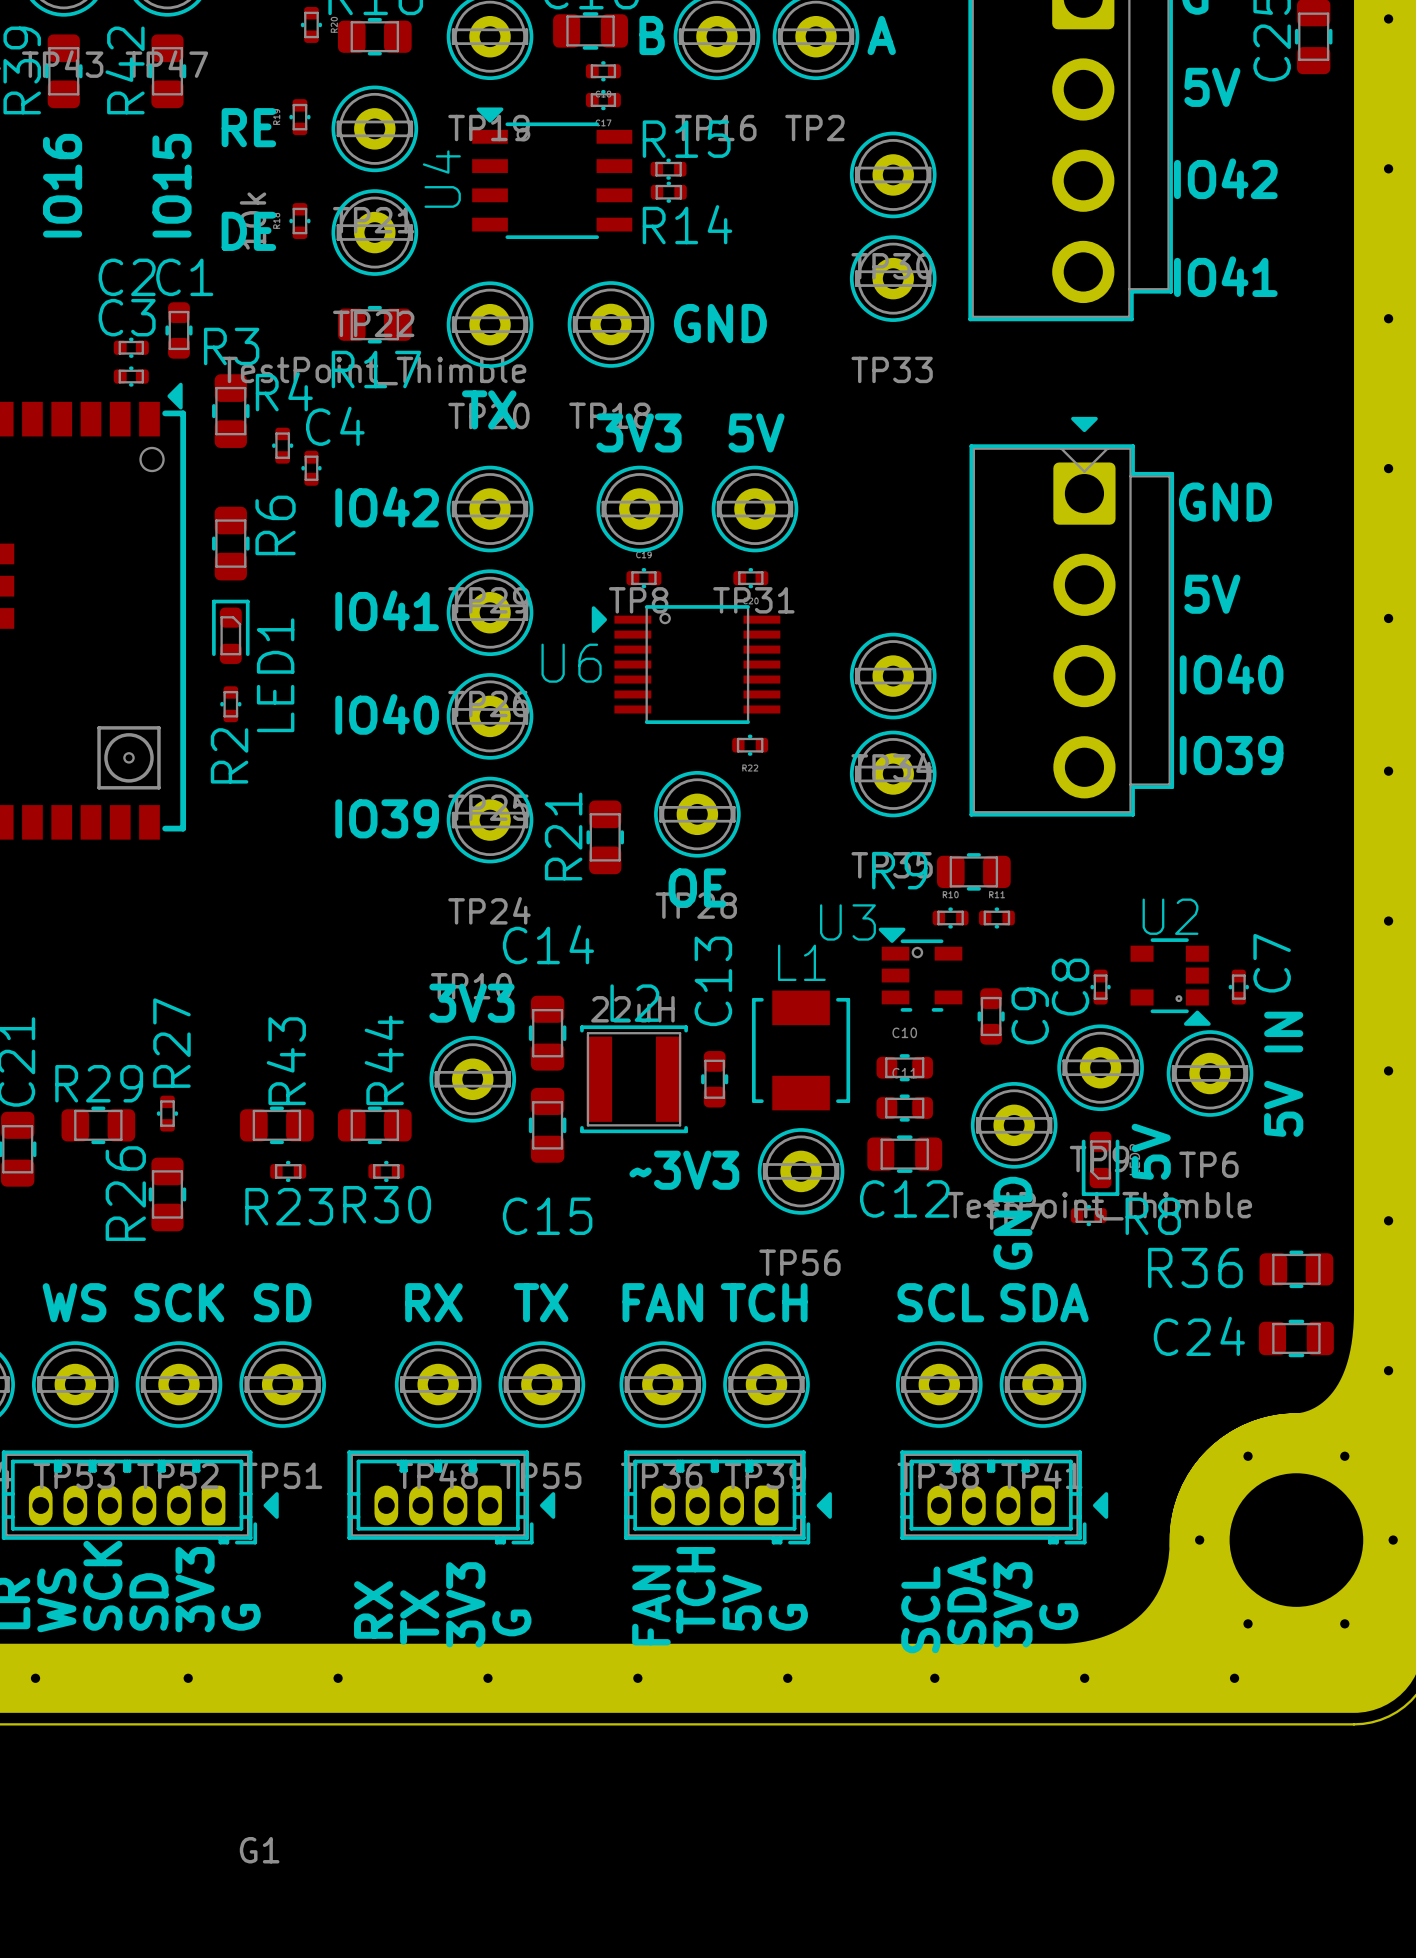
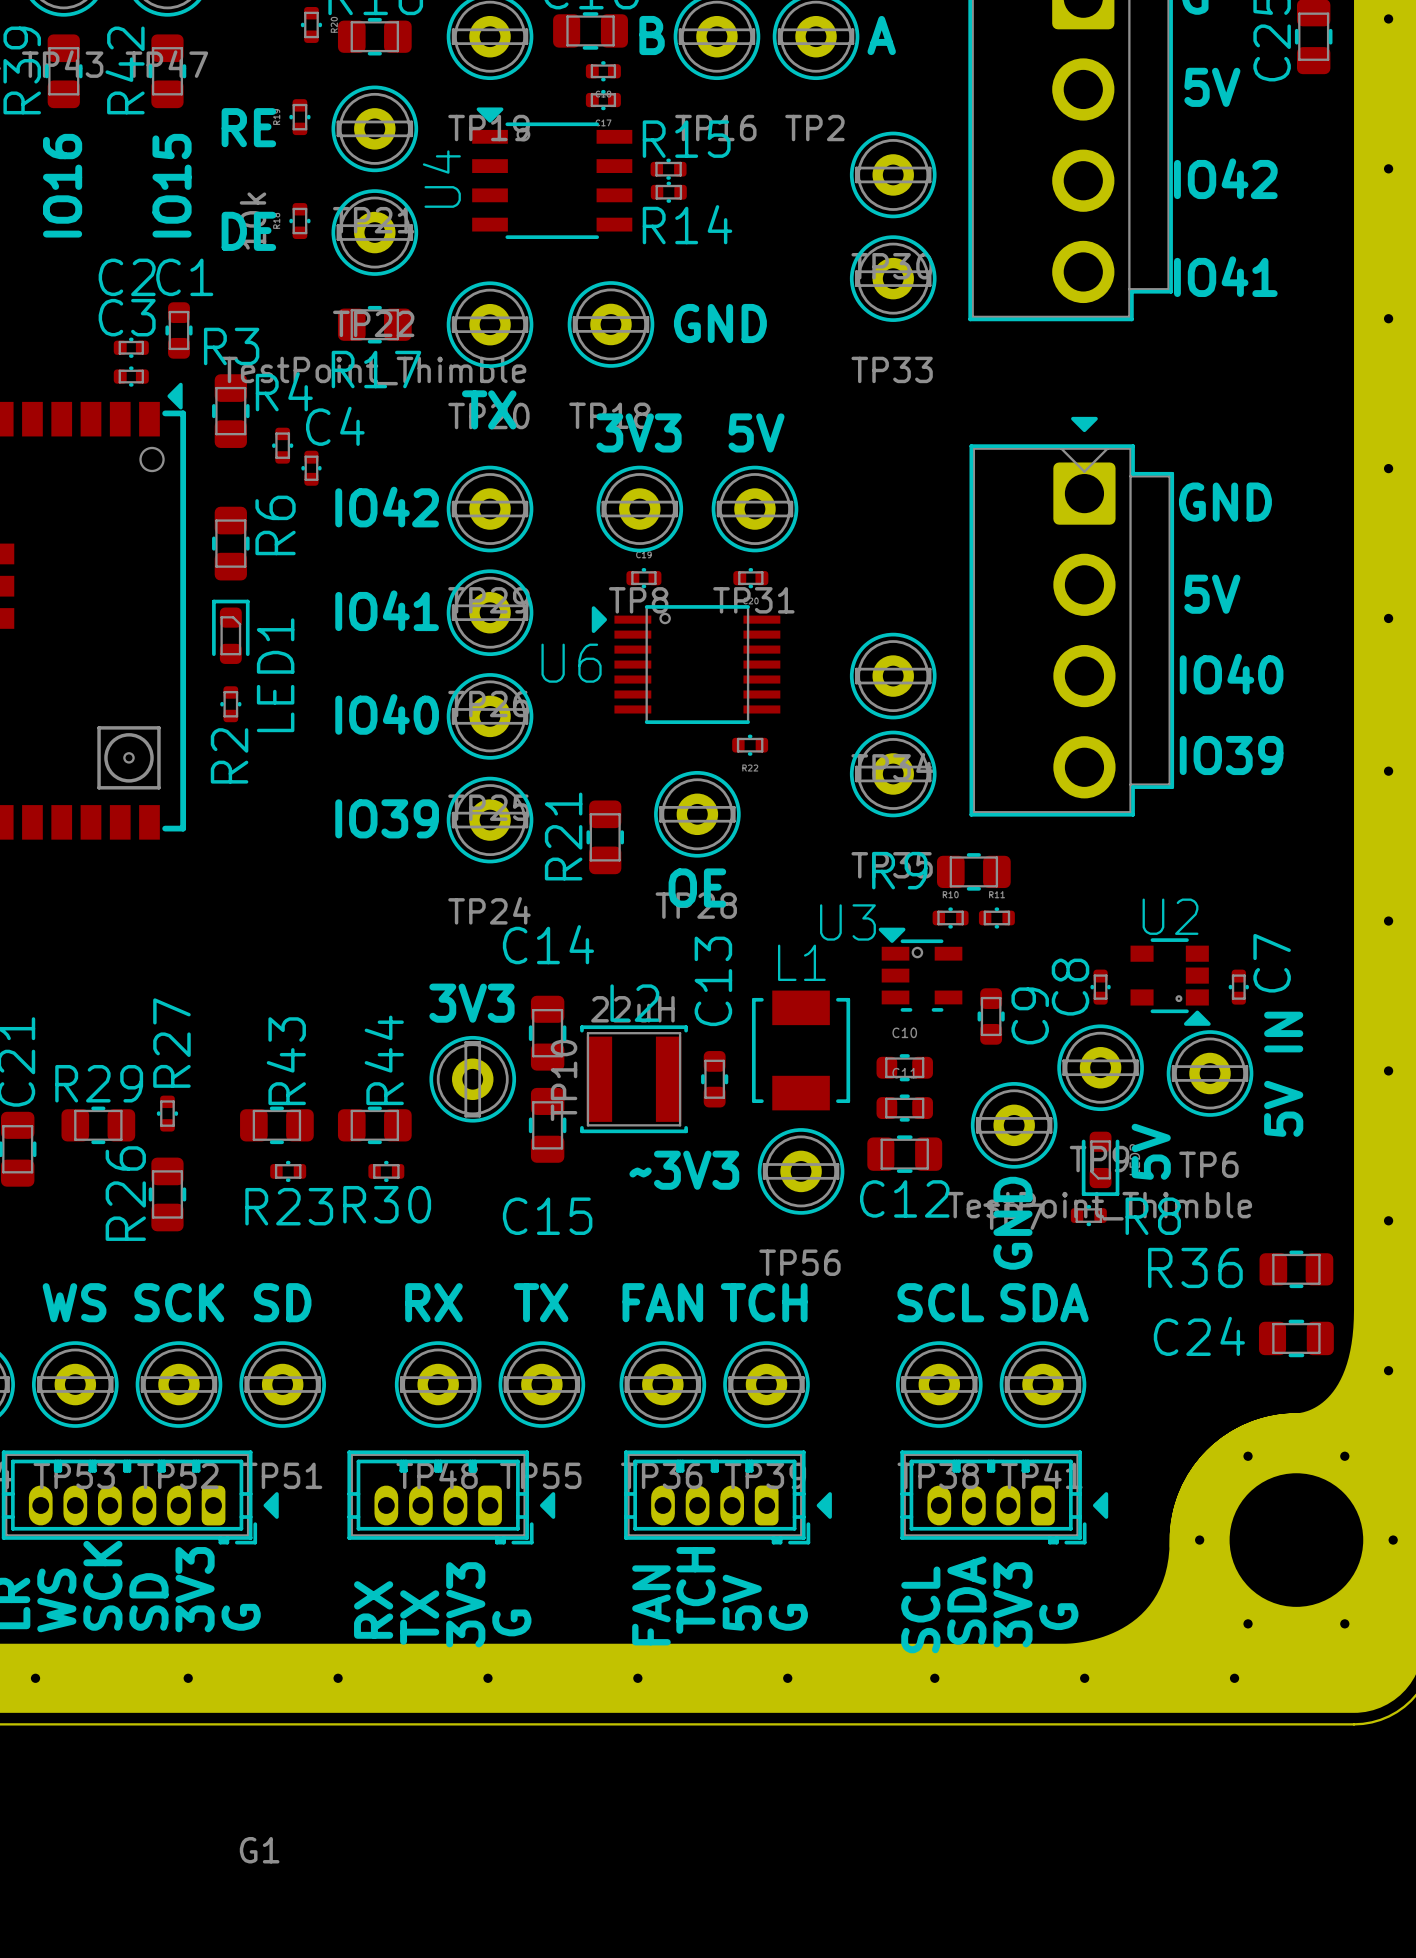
TP10 rotation: 0° (472, 1079) -> 90° clockwise (472, 1079)

